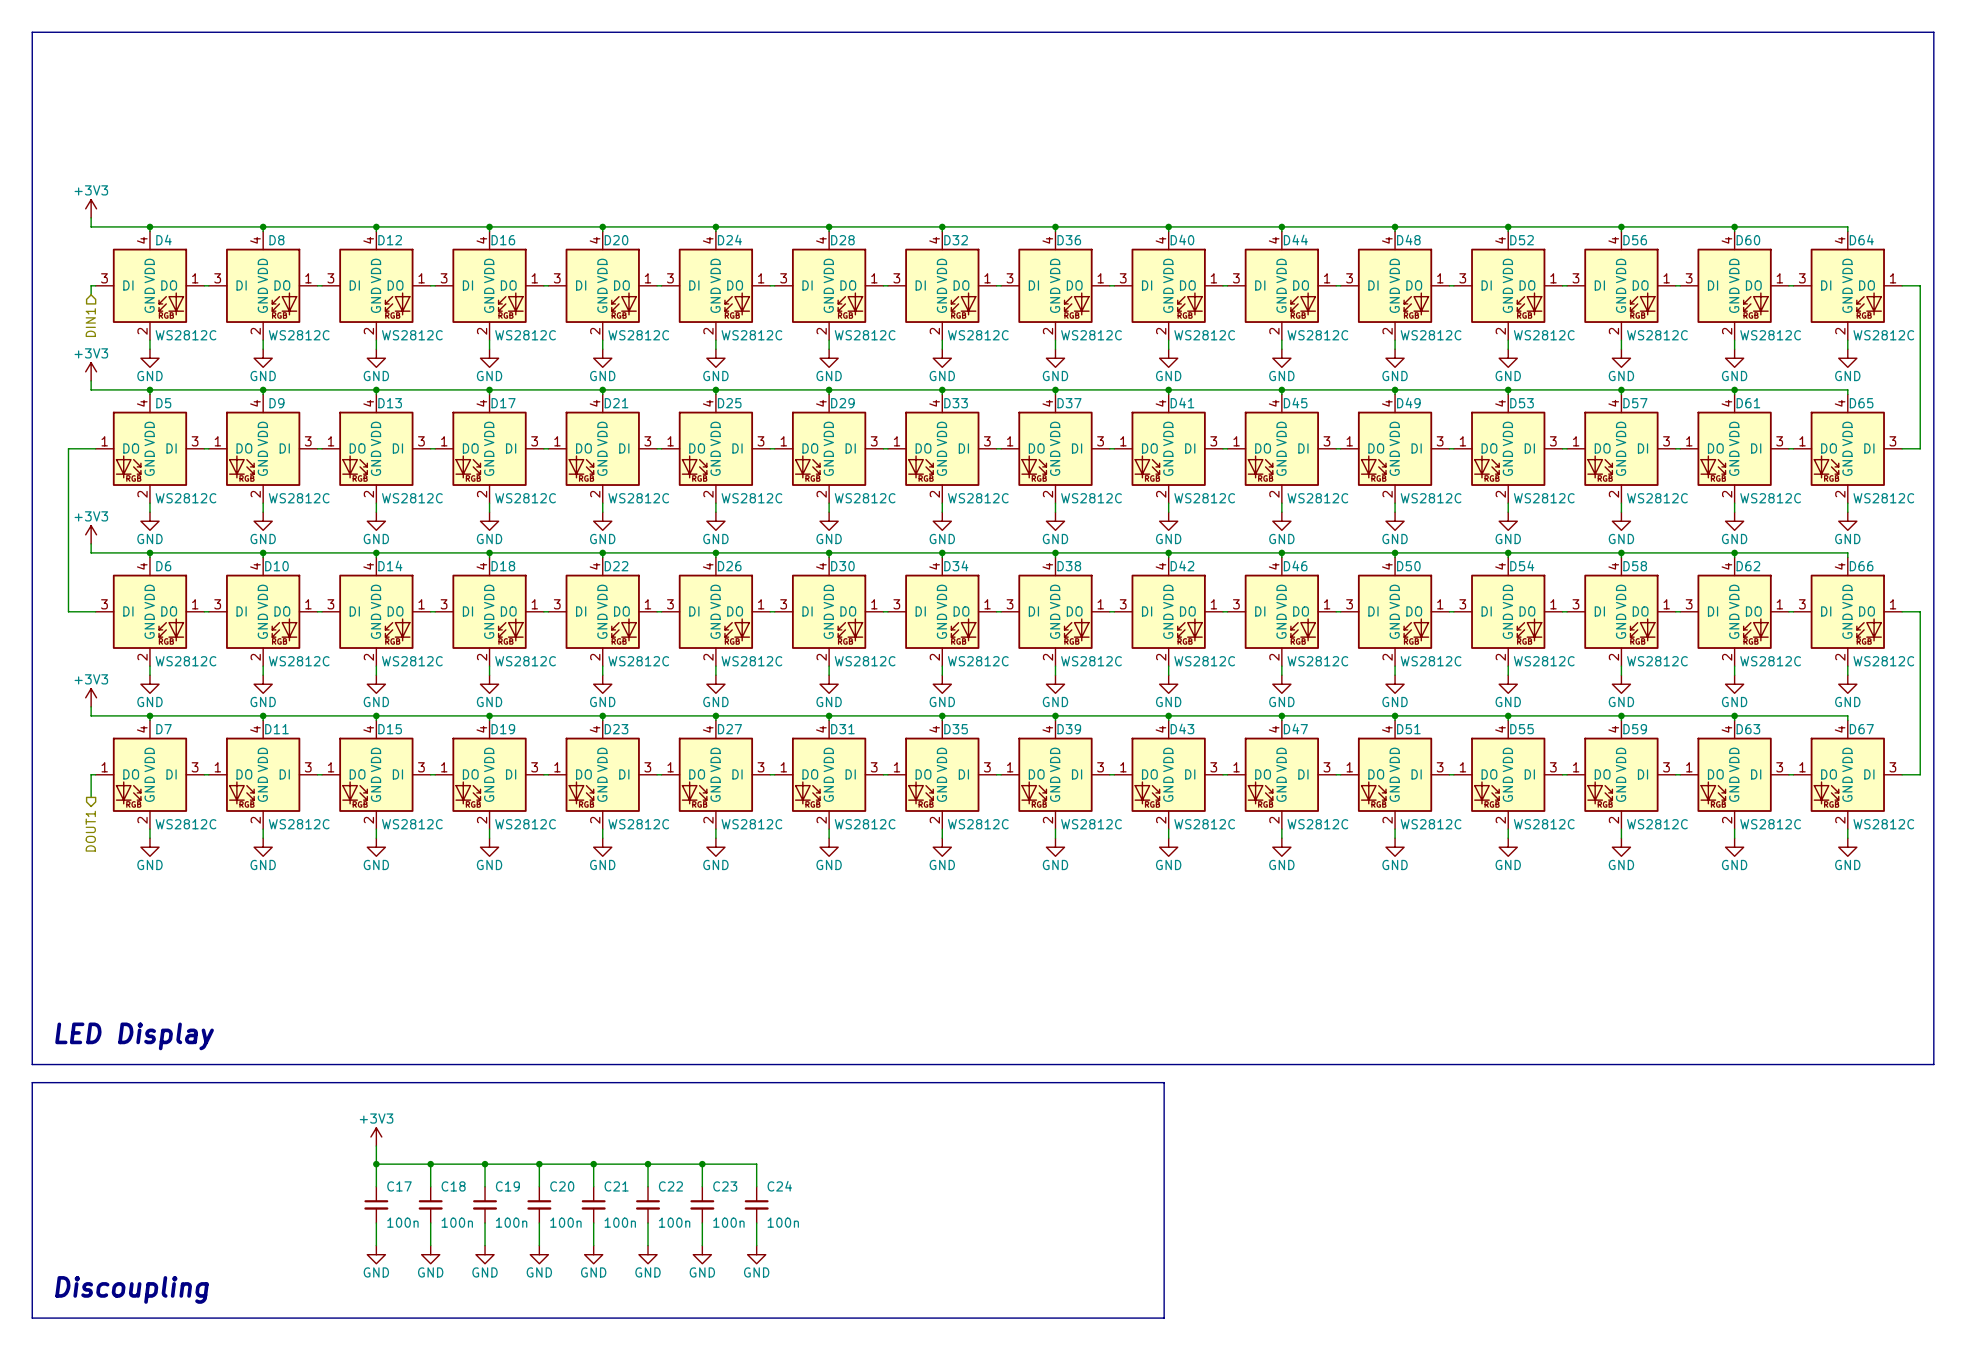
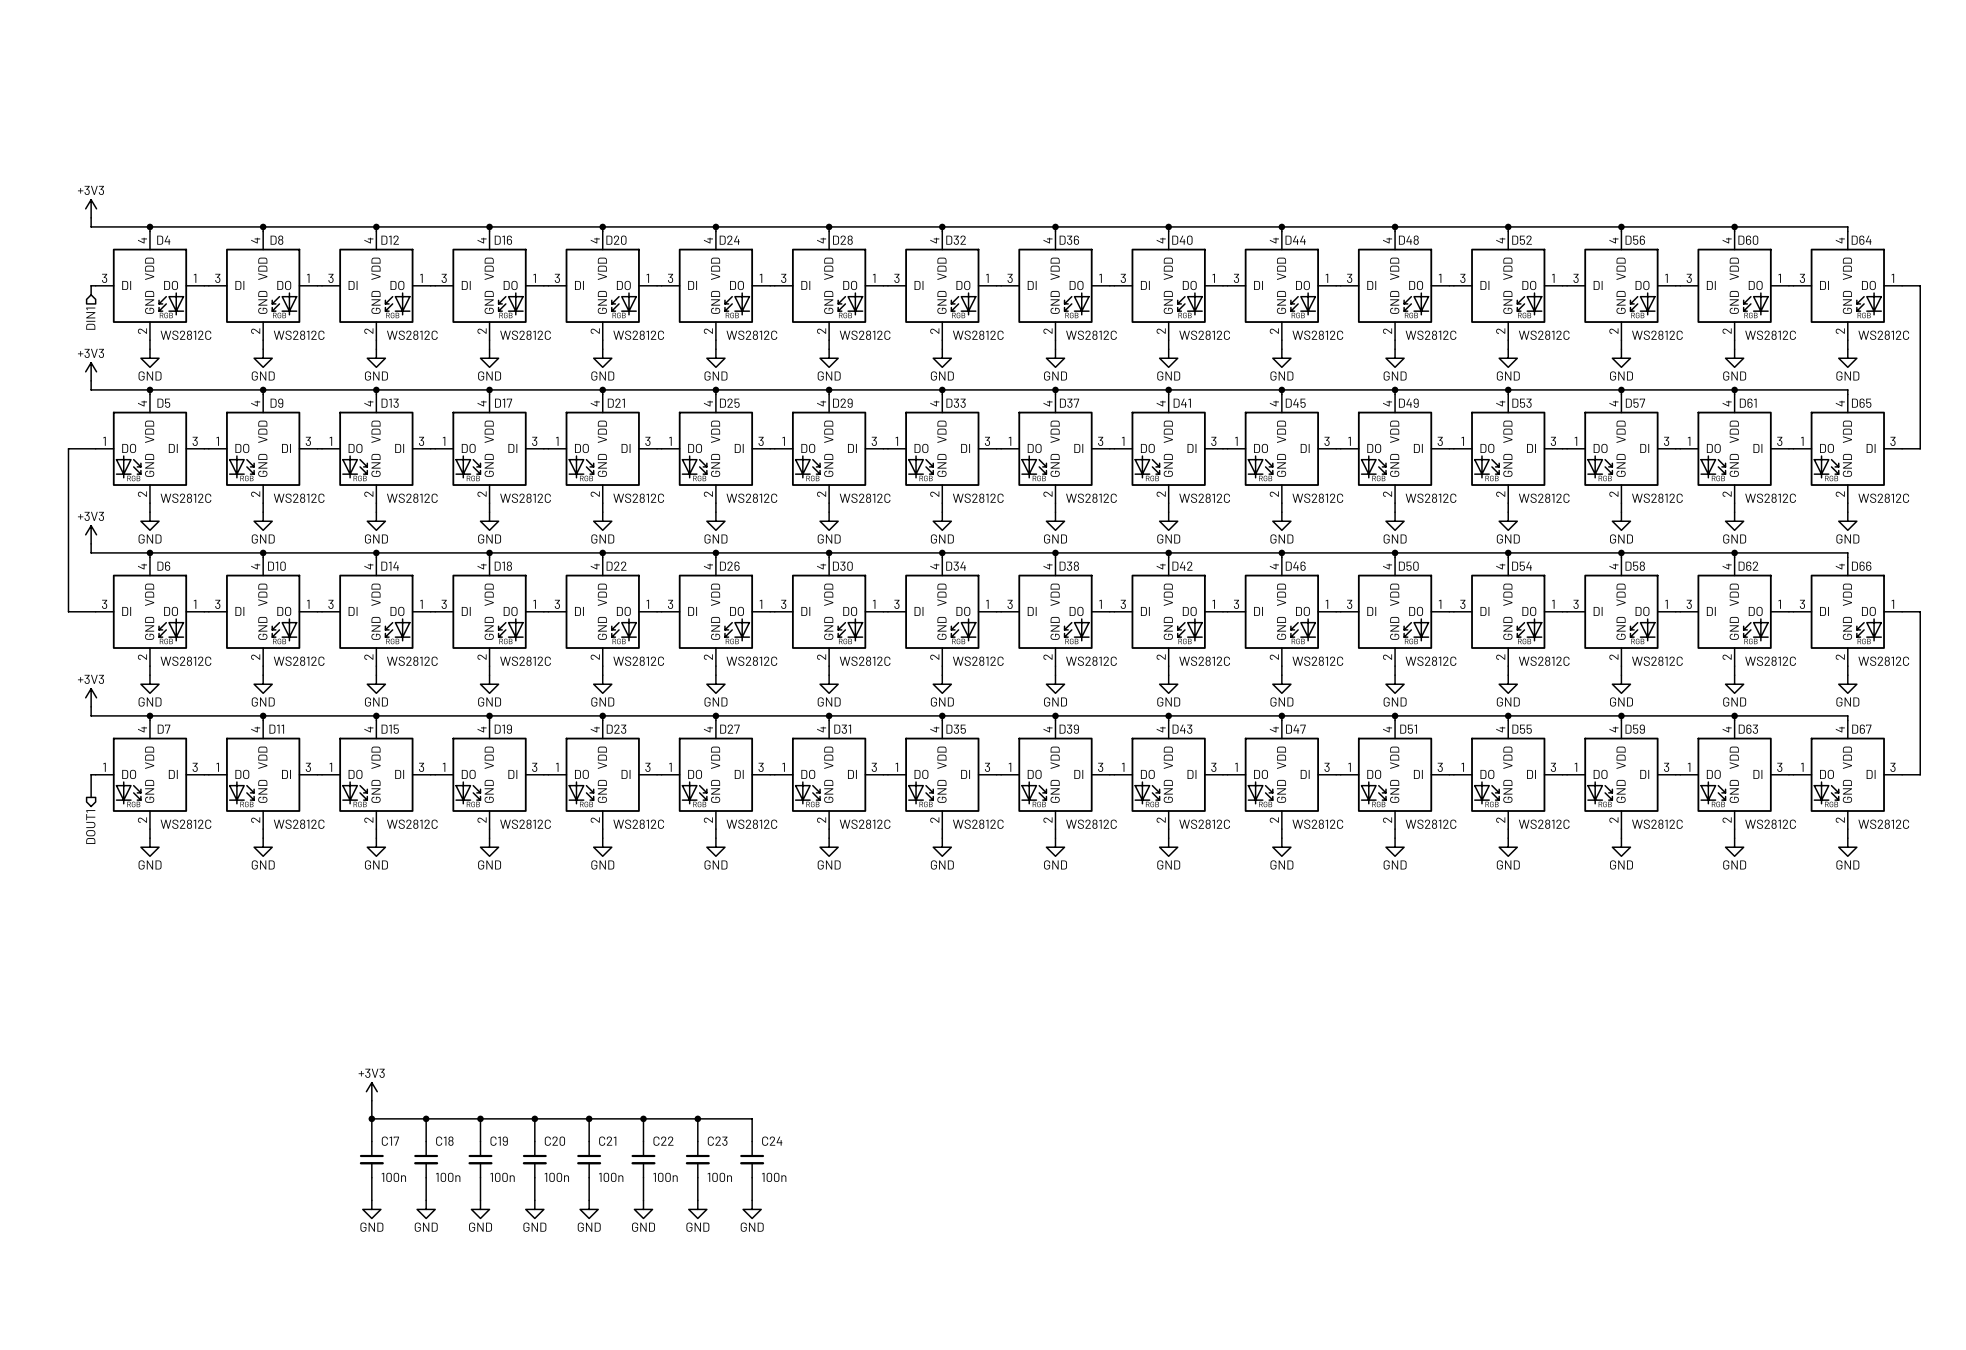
line: (32, 32) (1933, 32) (1933, 1064) (32, 1064) (32, 32) -> none
text: LED Display (134, 1036) -> none
line: (32, 1082) (32, 1318) (1164, 1318) (1164, 1082) (32, 1082) -> none
junction: none -> (371, 1118)
junction: none -> (426, 1118)
junction: none -> (480, 1118)
junction: none -> (534, 1118)
junction: none -> (589, 1118)
junction: none -> (643, 1118)
junction: none -> (697, 1118)
power symbol position: +3V3 (376, 1136) -> +3V3 (371, 1091)
wire: (376, 1146) (376, 1186) -> (371, 1100) (371, 1141)
wire: (376, 1164) (756, 1164) (756, 1186) -> (371, 1118) (752, 1118) (752, 1141)
junction: (376, 1164) -> none
wire: (430, 1164) (430, 1186) -> (426, 1118) (426, 1141)
junction: (430, 1164) -> none
wire: (485, 1164) (485, 1186) -> (480, 1118) (480, 1141)
junction: (485, 1164) -> none
wire: (539, 1164) (539, 1186) -> (534, 1118) (534, 1141)
junction: (539, 1164) -> none
wire: (593, 1164) (593, 1186) -> (589, 1118) (589, 1141)
junction: (593, 1164) -> none
wire: (648, 1164) (648, 1186) -> (643, 1118) (643, 1141)
junction: (648, 1164) -> none
wire: (702, 1164) (702, 1186) -> (697, 1118) (697, 1141)
junction: (702, 1164) -> none
C17 position: (376, 1204) -> (371, 1159)
C18 position: (430, 1204) -> (426, 1159)
C19 position: (485, 1204) -> (480, 1159)
C20 position: (539, 1204) -> (534, 1159)
C21 position: (593, 1204) -> (589, 1159)
C22 position: (648, 1204) -> (643, 1159)
C23 position: (702, 1204) -> (697, 1159)
C24 position: (756, 1204) -> (752, 1159)
power symbol: none -> GND (371, 1209)
power symbol: none -> GND (426, 1209)
power symbol: none -> GND (480, 1209)
power symbol: none -> GND (534, 1209)
power symbol: none -> GND (589, 1209)
power symbol: none -> GND (643, 1209)
power symbol: none -> GND (697, 1209)
power symbol: none -> GND (752, 1209)
wire: (376, 1223) (376, 1245) -> (371, 1177) (371, 1200)
wire: (430, 1223) (430, 1245) -> (426, 1177) (426, 1200)
wire: (485, 1223) (485, 1245) -> (480, 1177) (480, 1200)
wire: (539, 1223) (539, 1245) -> (534, 1177) (534, 1200)
wire: (593, 1223) (593, 1245) -> (589, 1177) (589, 1200)
wire: (648, 1223) (648, 1245) -> (643, 1177) (643, 1200)
wire: (702, 1223) (702, 1245) -> (697, 1177) (697, 1200)
wire: (756, 1223) (756, 1245) -> (752, 1177) (752, 1200)
power symbol: GND (376, 1254) -> none
power symbol: GND (430, 1254) -> none
power symbol: GND (485, 1254) -> none
power symbol: GND (539, 1254) -> none
power symbol: GND (593, 1254) -> none
power symbol: GND (648, 1254) -> none
power symbol: GND (702, 1254) -> none
power symbol: GND (756, 1254) -> none
text: Discoupling (131, 1289) -> none

